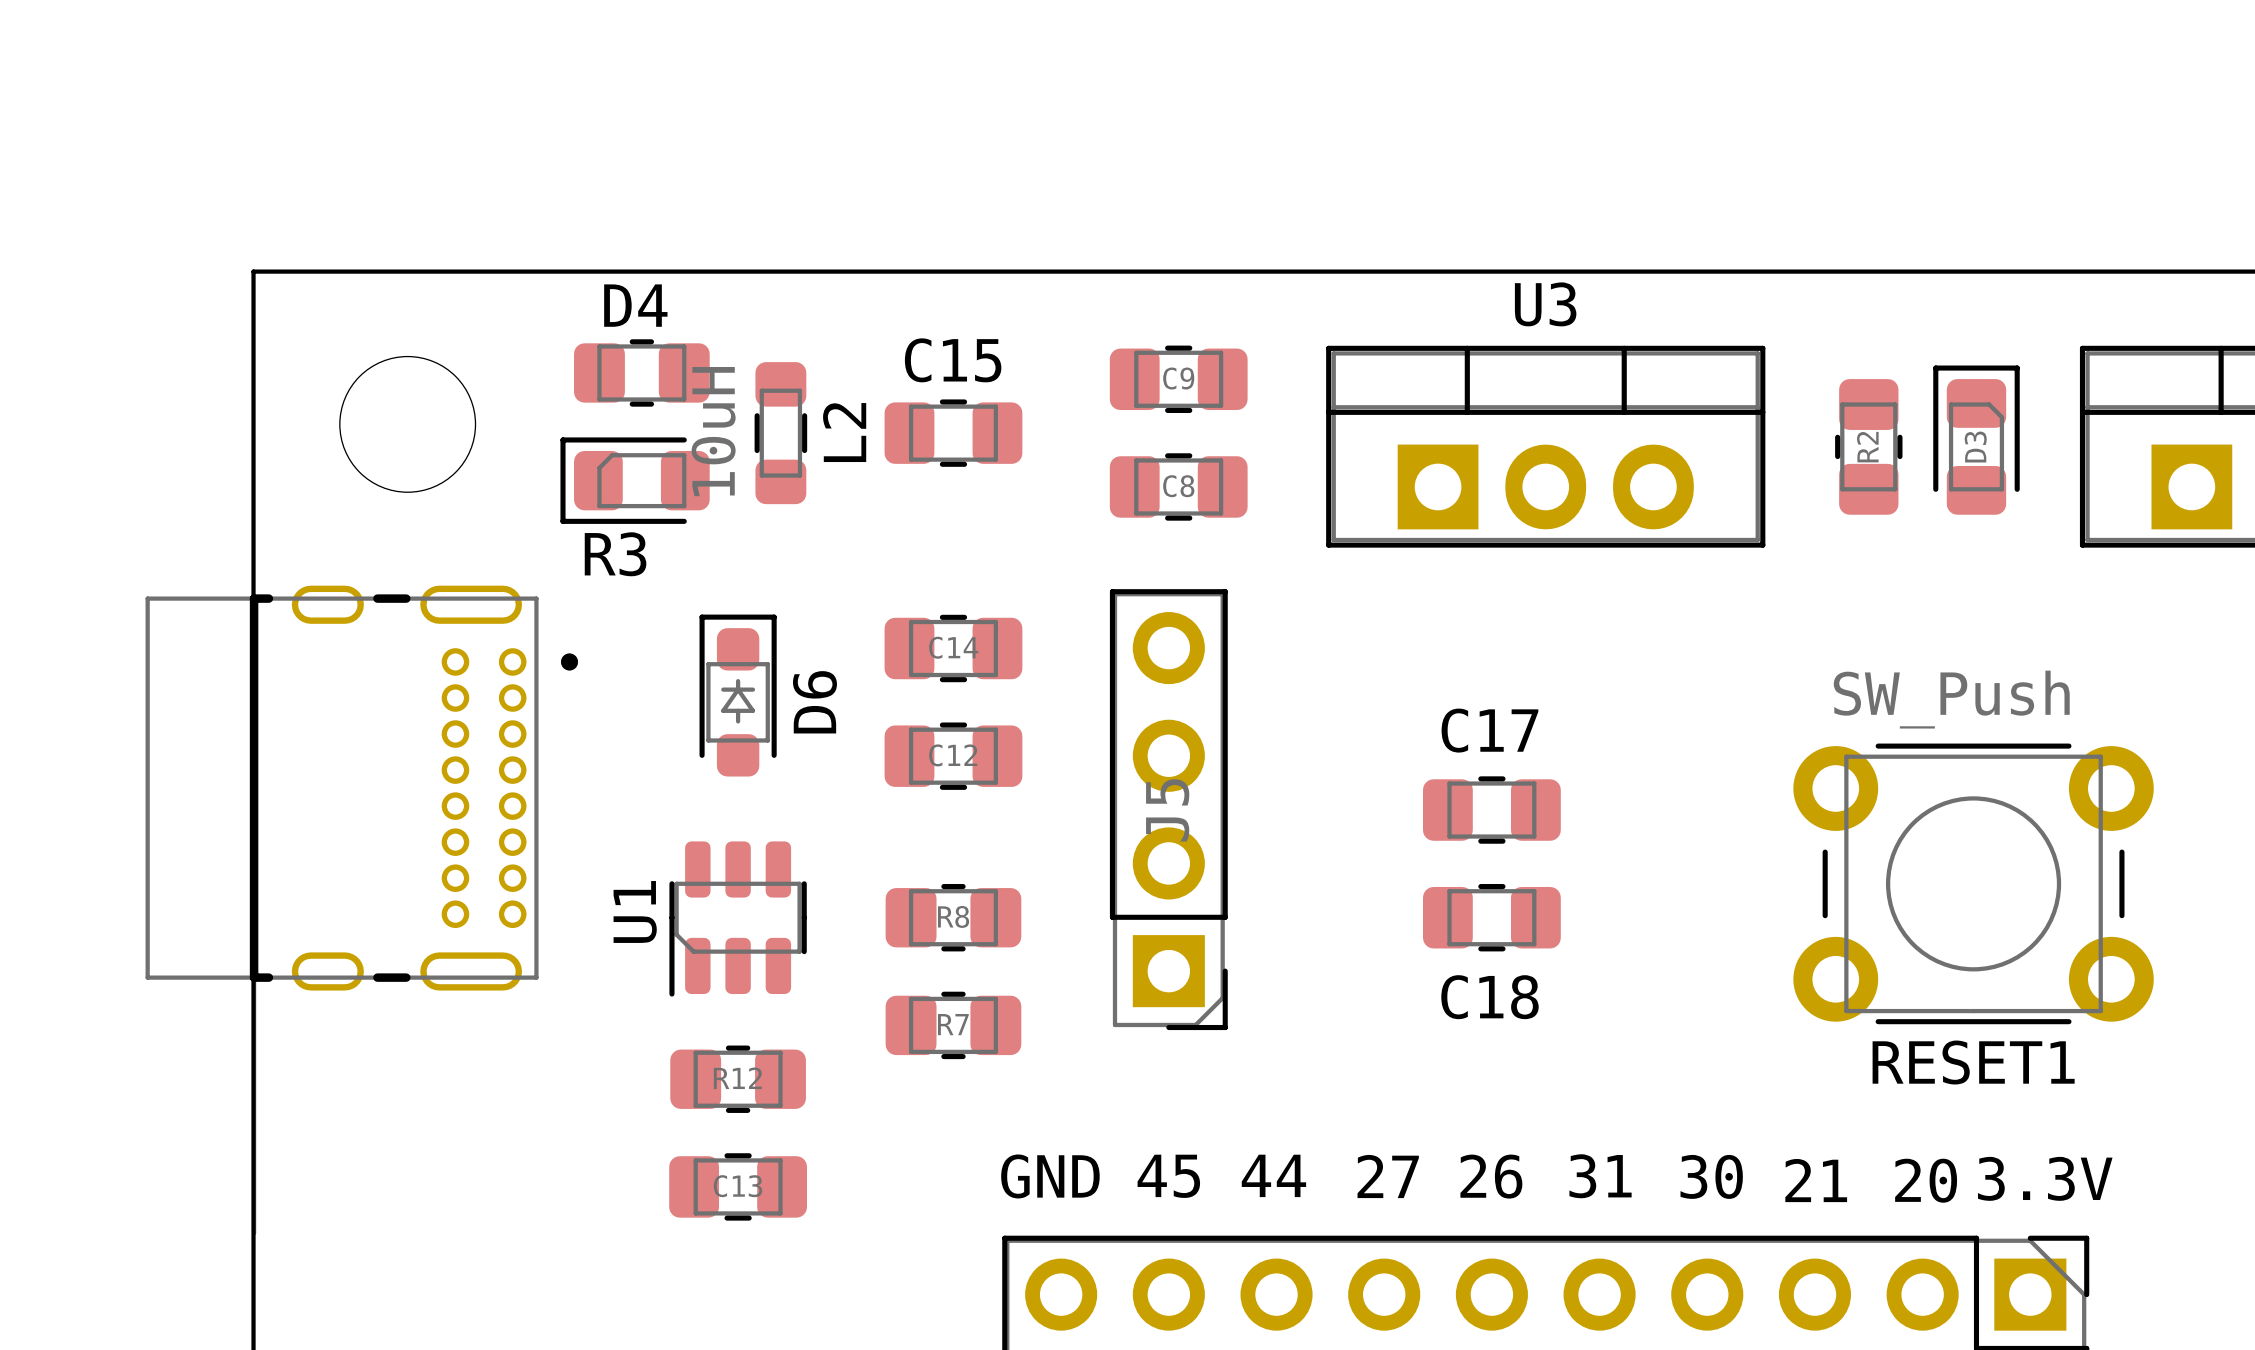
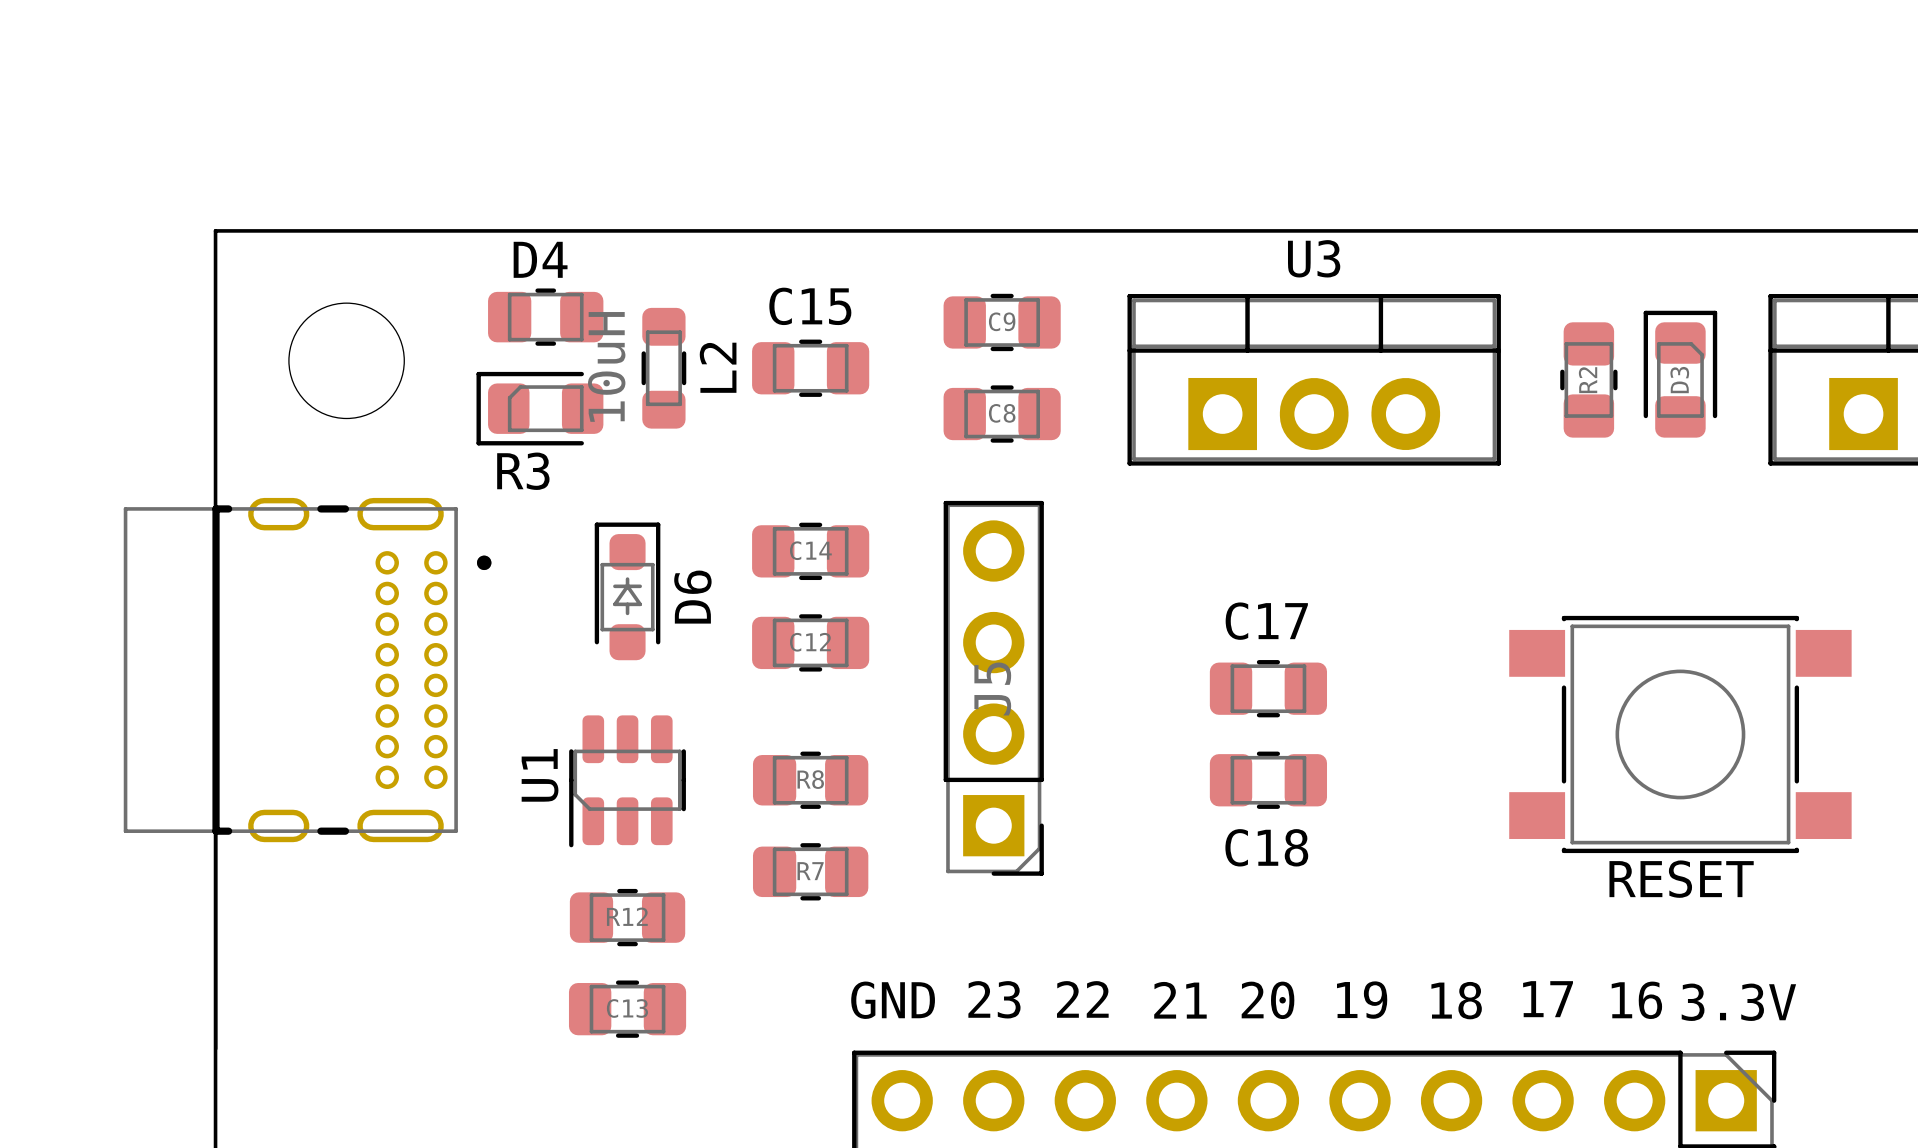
RESET: none -> (1680, 734)
RESET1: SW_Push (1973, 883) -> none
text: 44 (1273, 1175) -> 22 (1082, 999)
text: 45 (1168, 1176) -> 23 (994, 999)
text: 27 (1388, 1176) -> 21 (1180, 1000)
text: 26 (1491, 1176) -> 20 (1268, 1000)
text: 31 (1600, 1176) -> 19 (1362, 1000)
text: 30 (1711, 1176) -> 18 (1456, 1000)
text: 21 (1816, 1180) -> 17 (1548, 999)
text: 20 (1926, 1180) -> 16 (1636, 1000)

